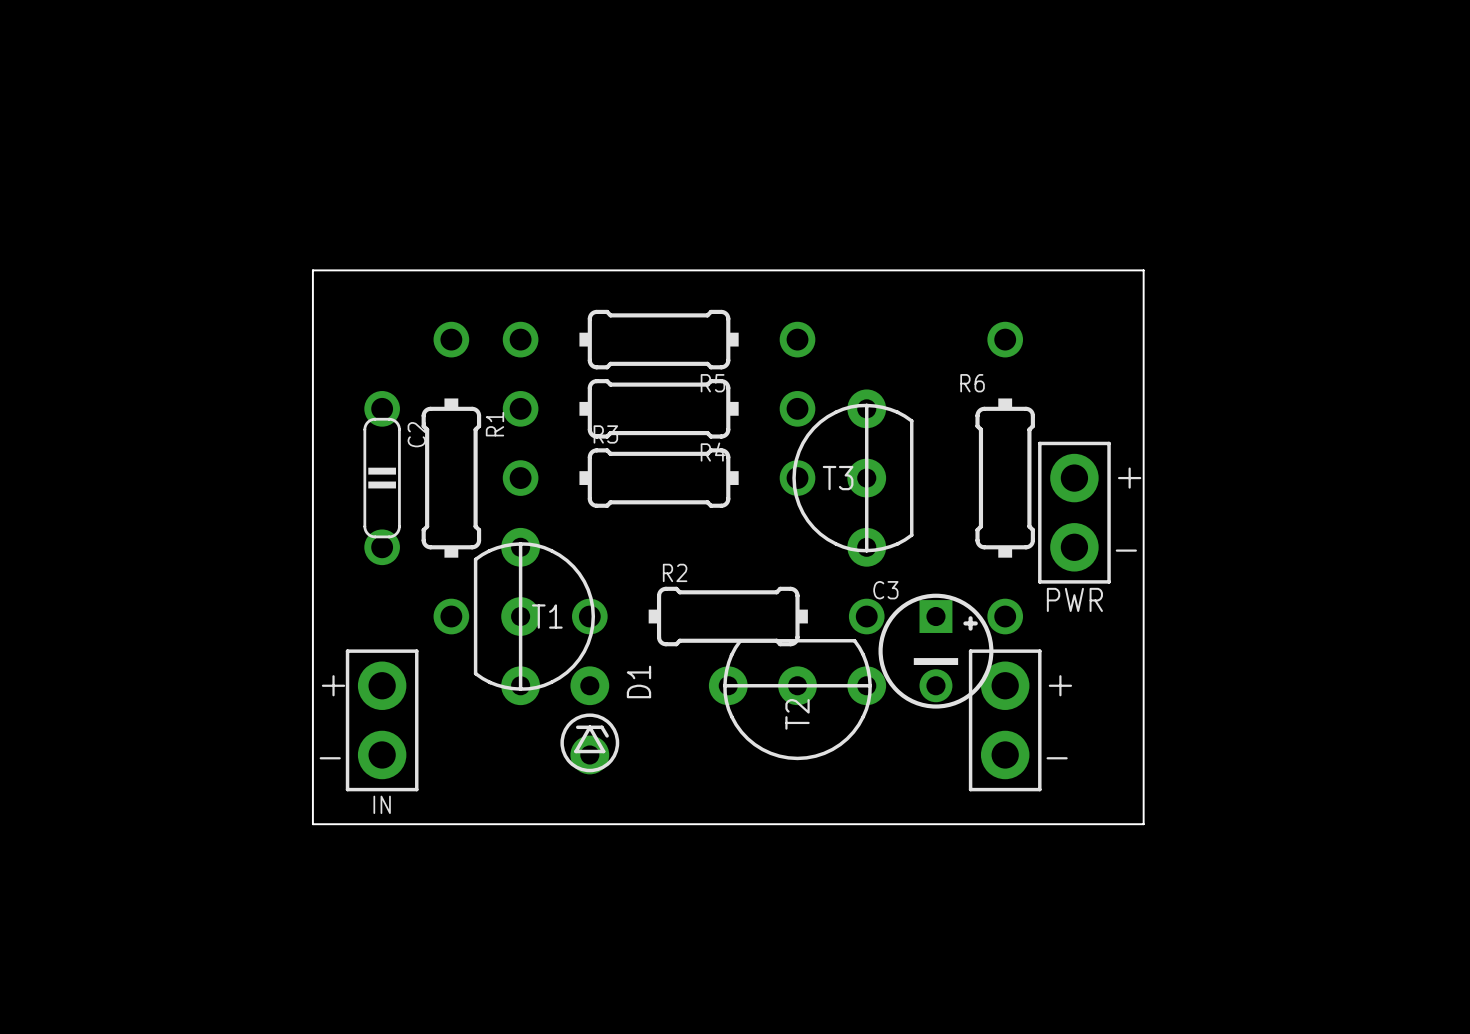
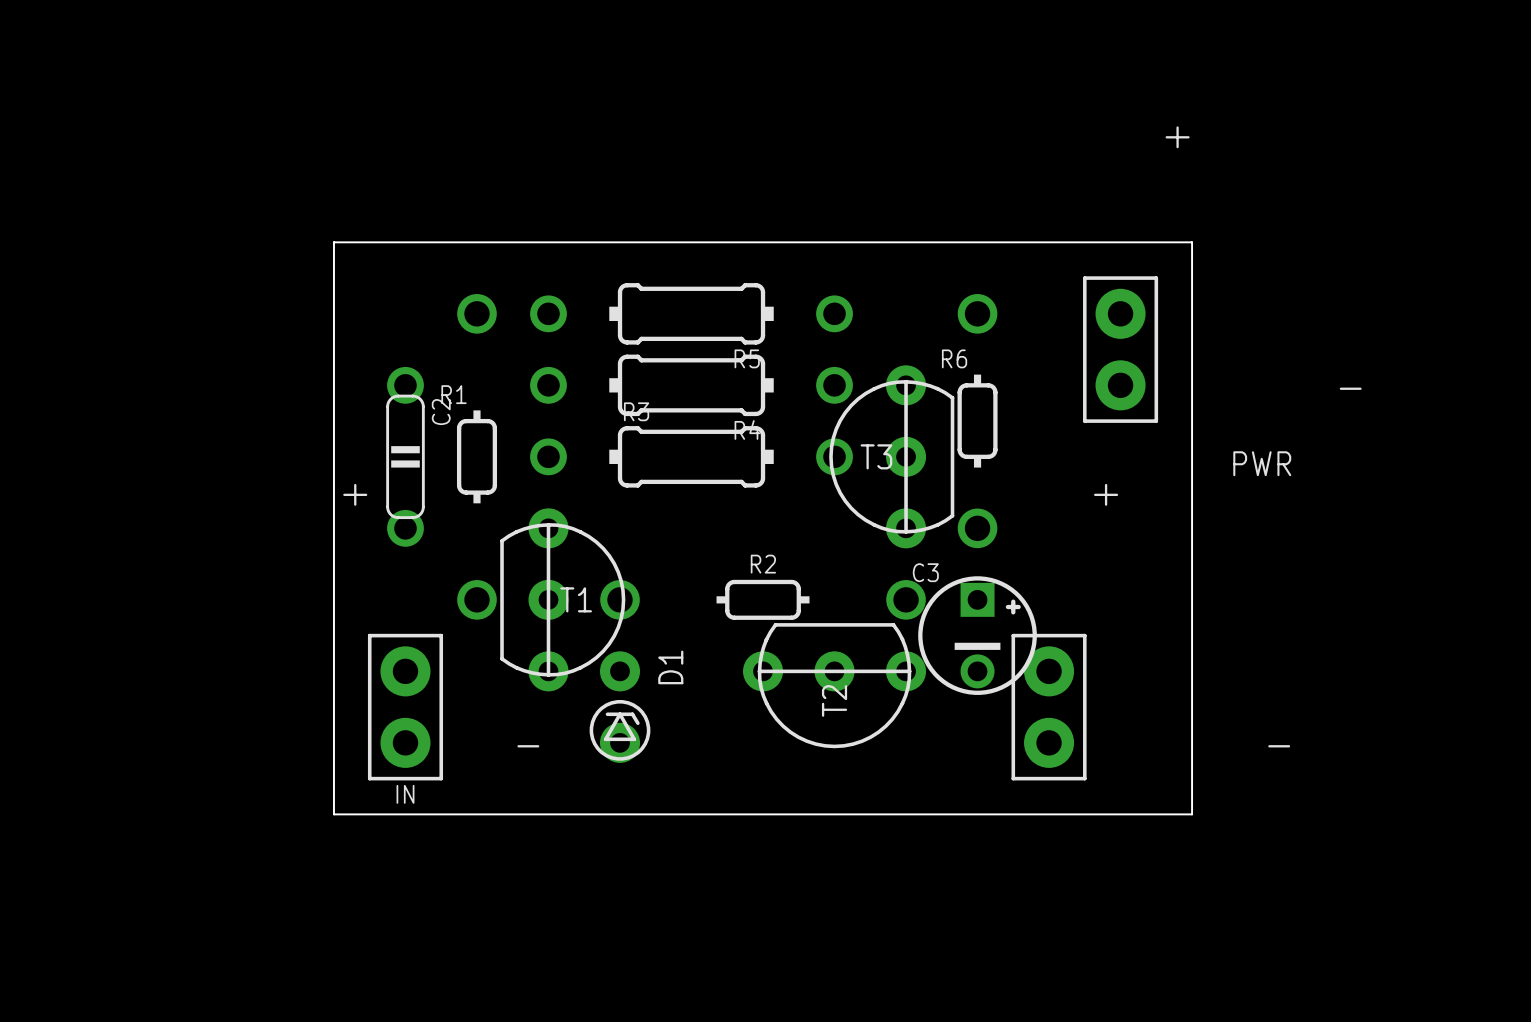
R1 footprint: [421, 321, 482, 635] -> [456, 294, 498, 620]
R6 footprint: [975, 321, 1035, 635] -> [957, 294, 998, 549]
part: none -> (1120, 349)
R1 name position: R1 (494, 424) -> R1 (454, 394)
part: (1074, 512) -> none
R2 footprint: [572, 586, 885, 647] -> [600, 579, 926, 620]
IN footprint: [345, 649, 419, 792] -> [367, 633, 444, 781]
part footprint: [968, 649, 1042, 792] -> [1011, 633, 1087, 781]

